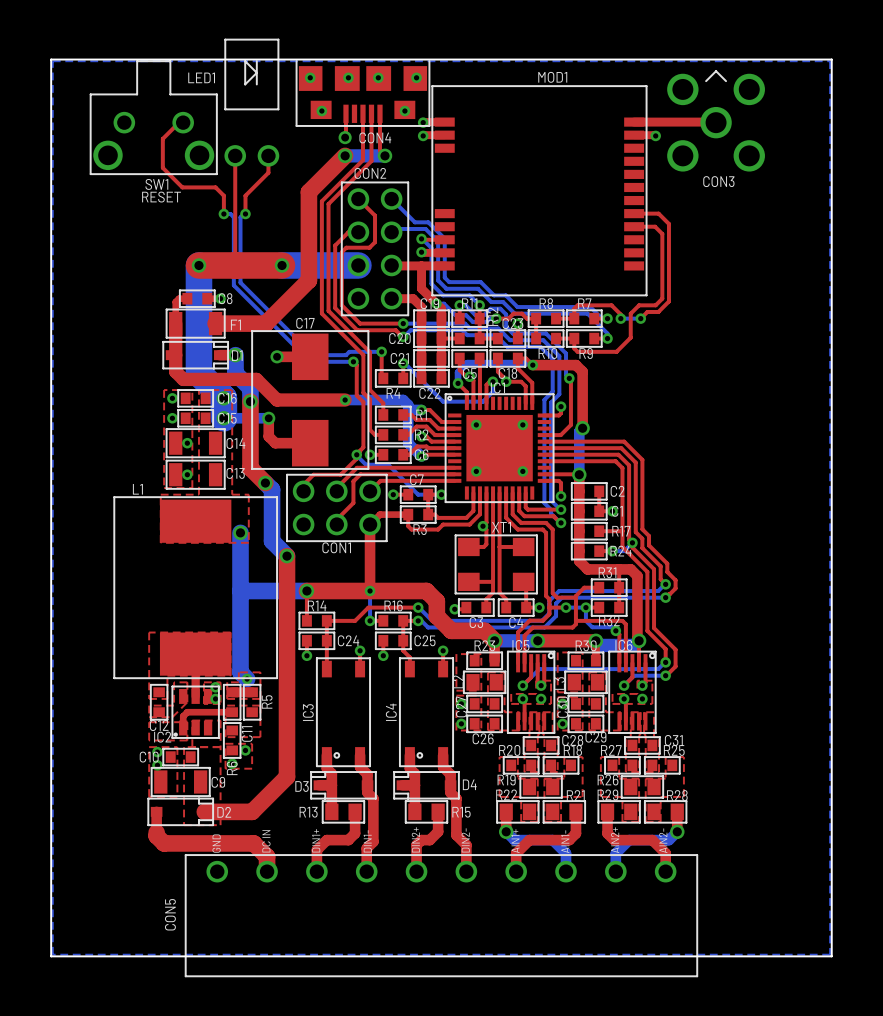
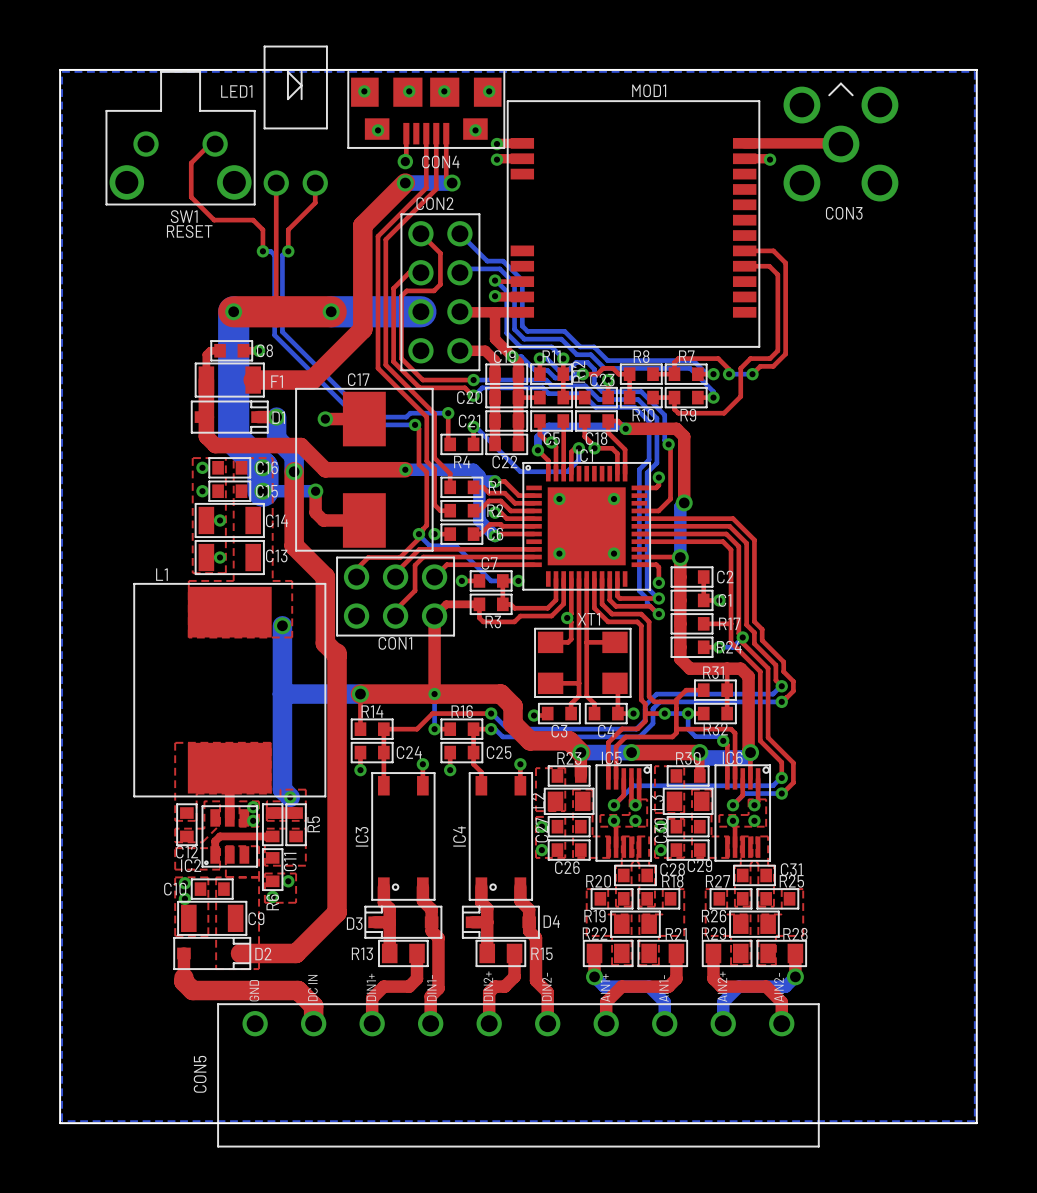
top track: (250, 464) (250, 468) (265, 483) -> (294, 545) (325, 577) (325, 643) (337, 655)
bottom track: (265, 483) (272, 489) (272, 541) (287, 556) -> none
via: (265, 483) -> none
via: (287, 556) -> none

